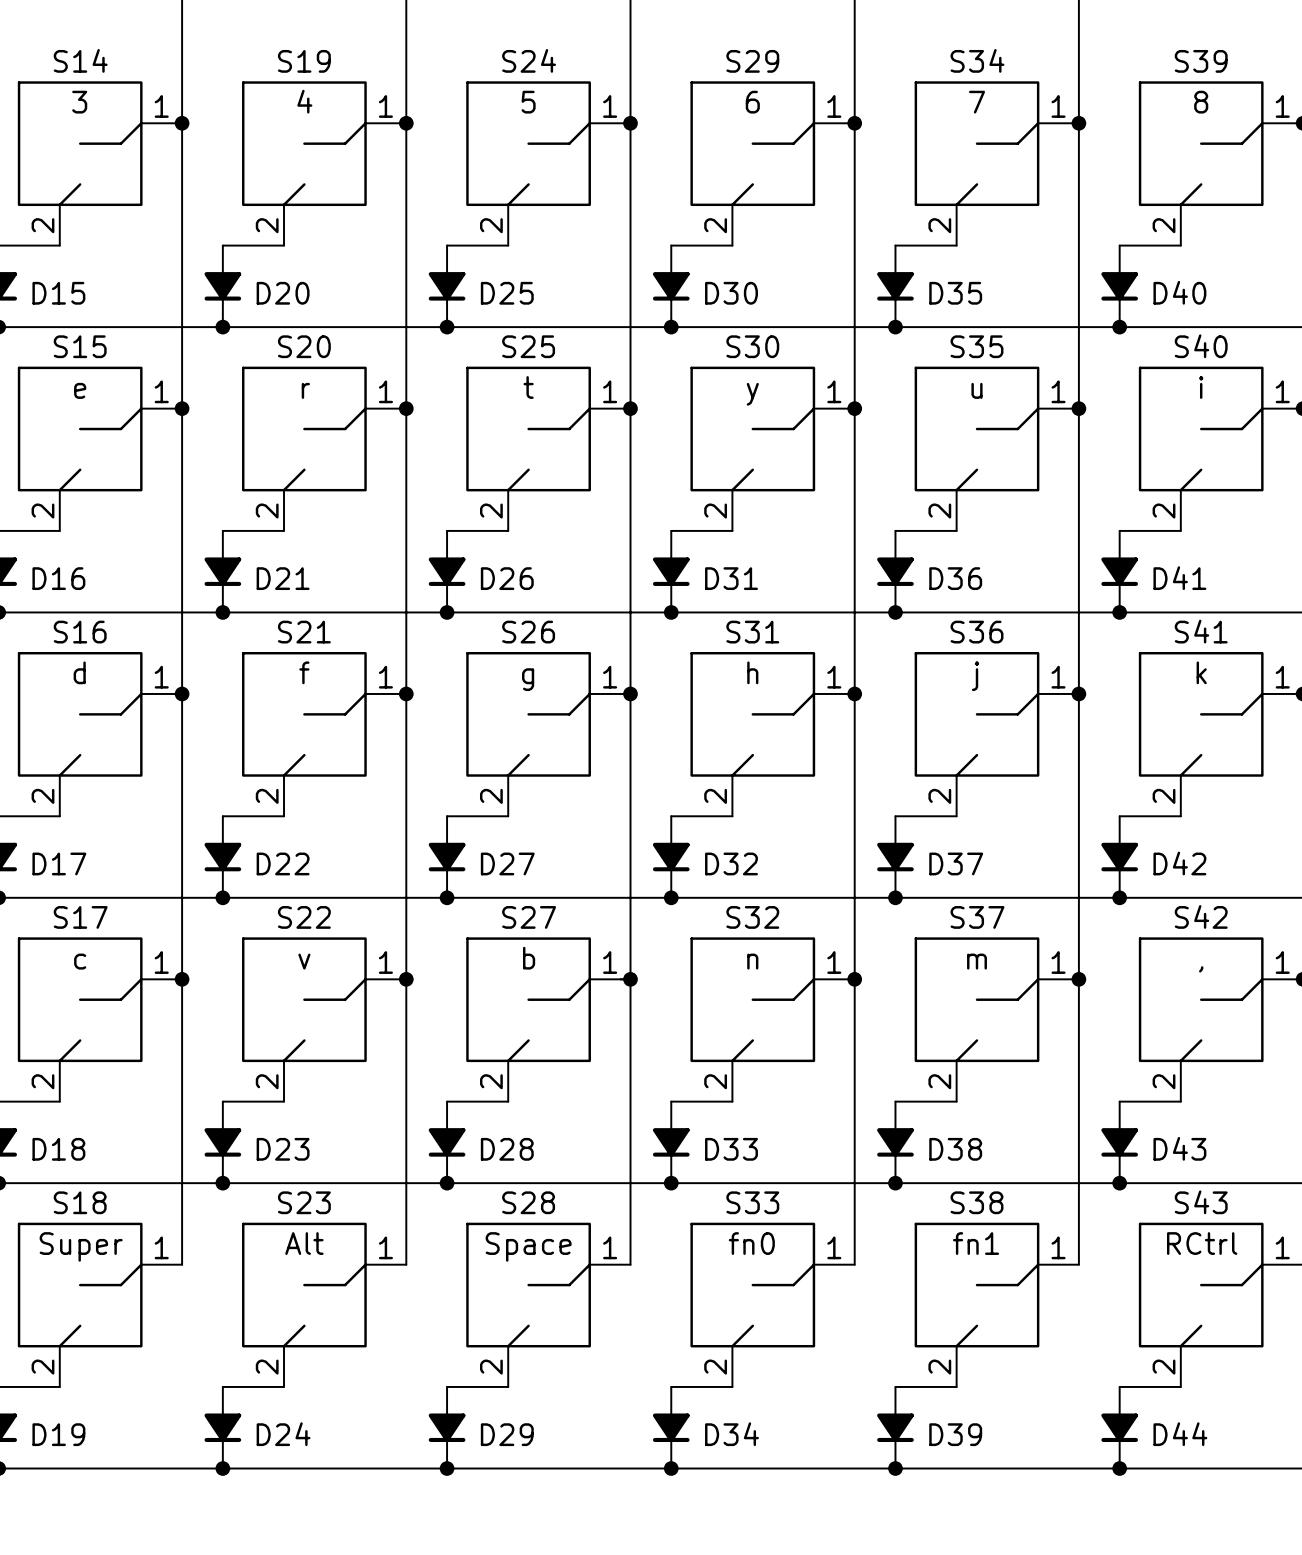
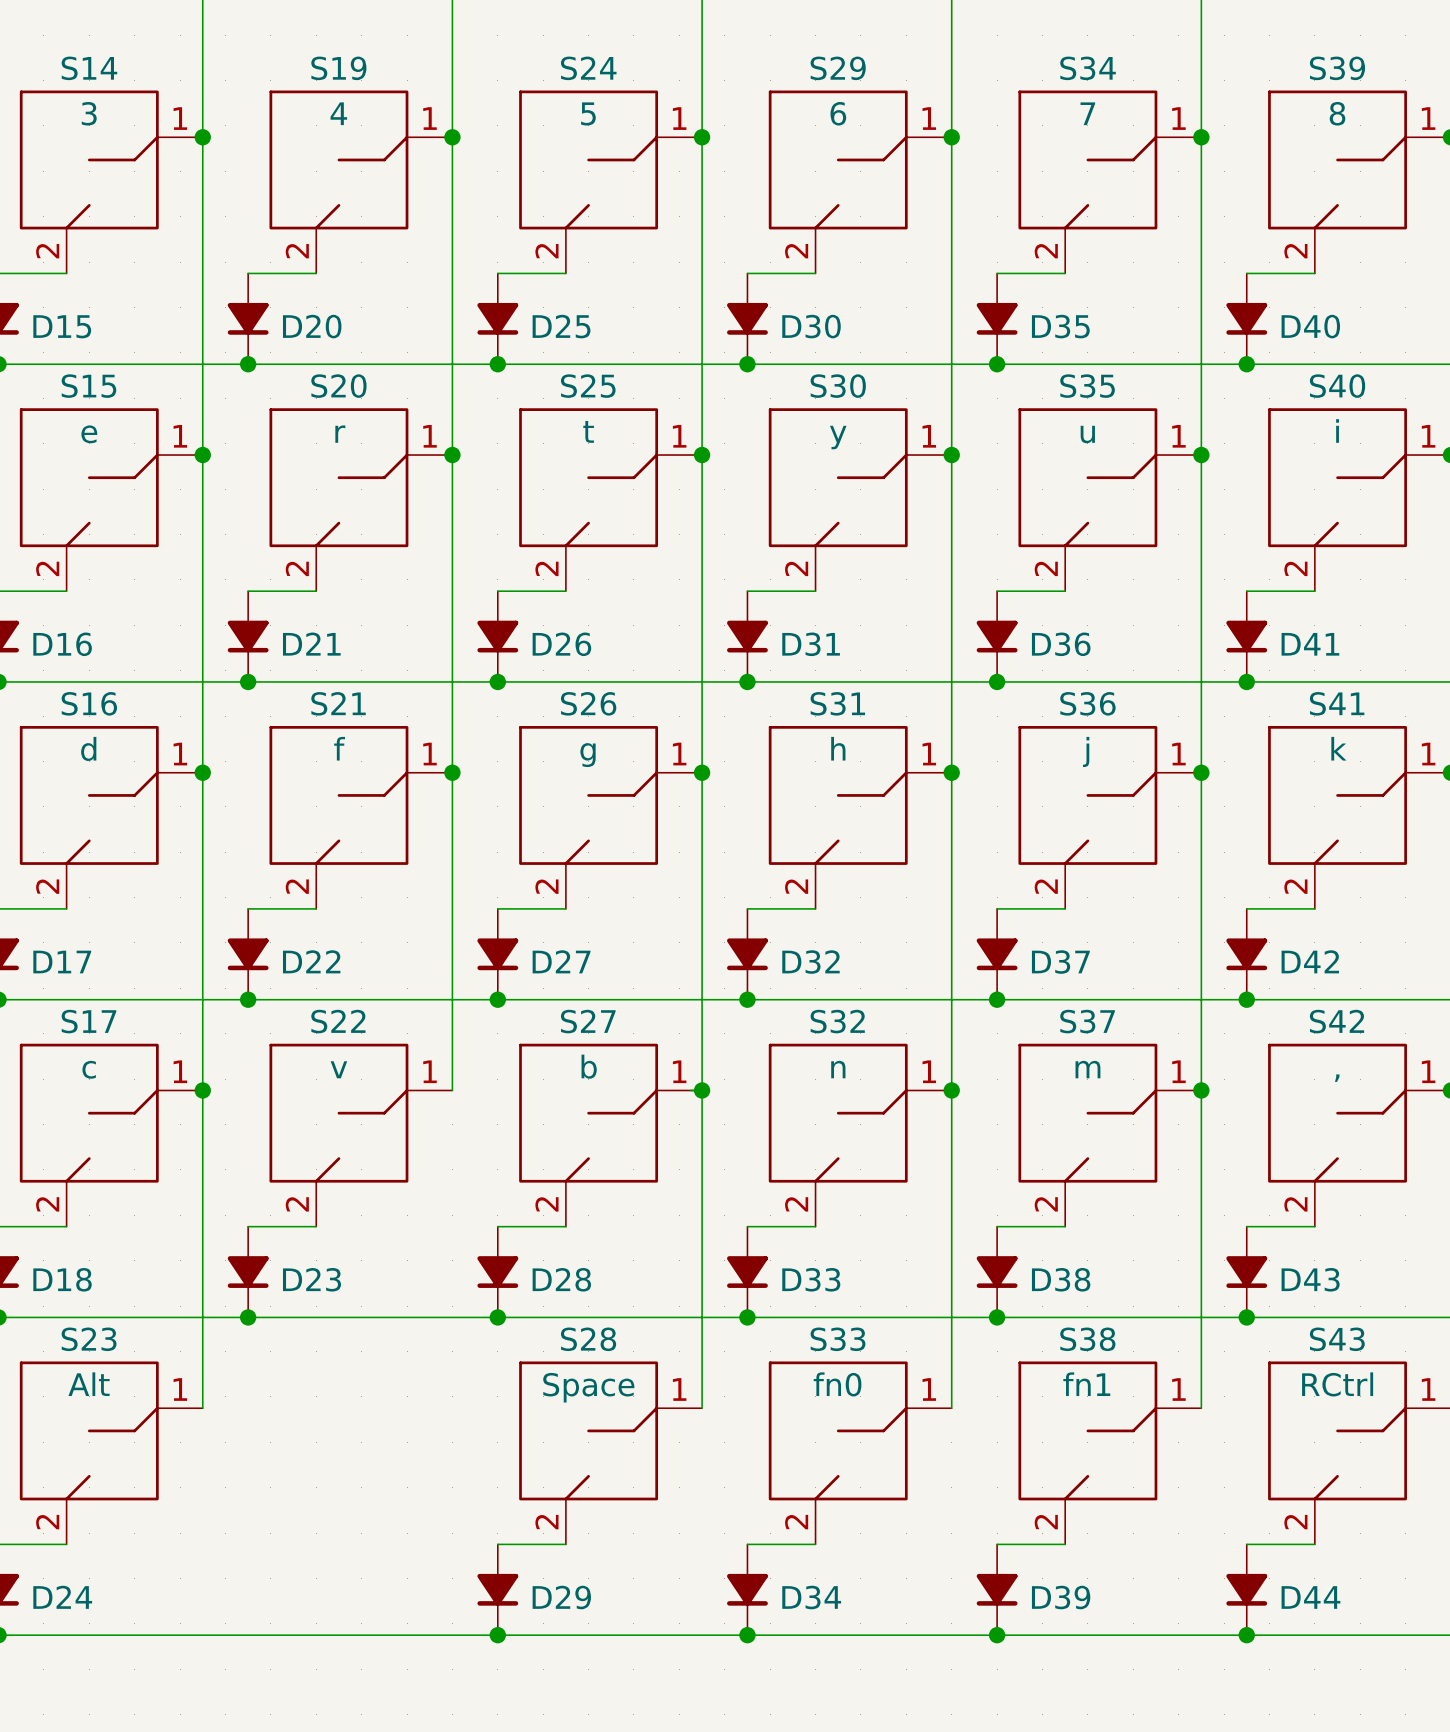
wire: (406, 979) (406, 1264) -> none
junction: (406, 979) -> none
S18 name: S18 (80, 1202) -> S23 (89, 1339)
S18 value: Super (81, 1246) -> Alt (89, 1384)
S23: Alt (324, 1304) -> none
wire: (222, 1386) (284, 1386) -> none
D24: (222, 1427) -> none
D19 name: D19 (58, 1434) -> D24 (62, 1597)
junction: (222, 1468) -> none

